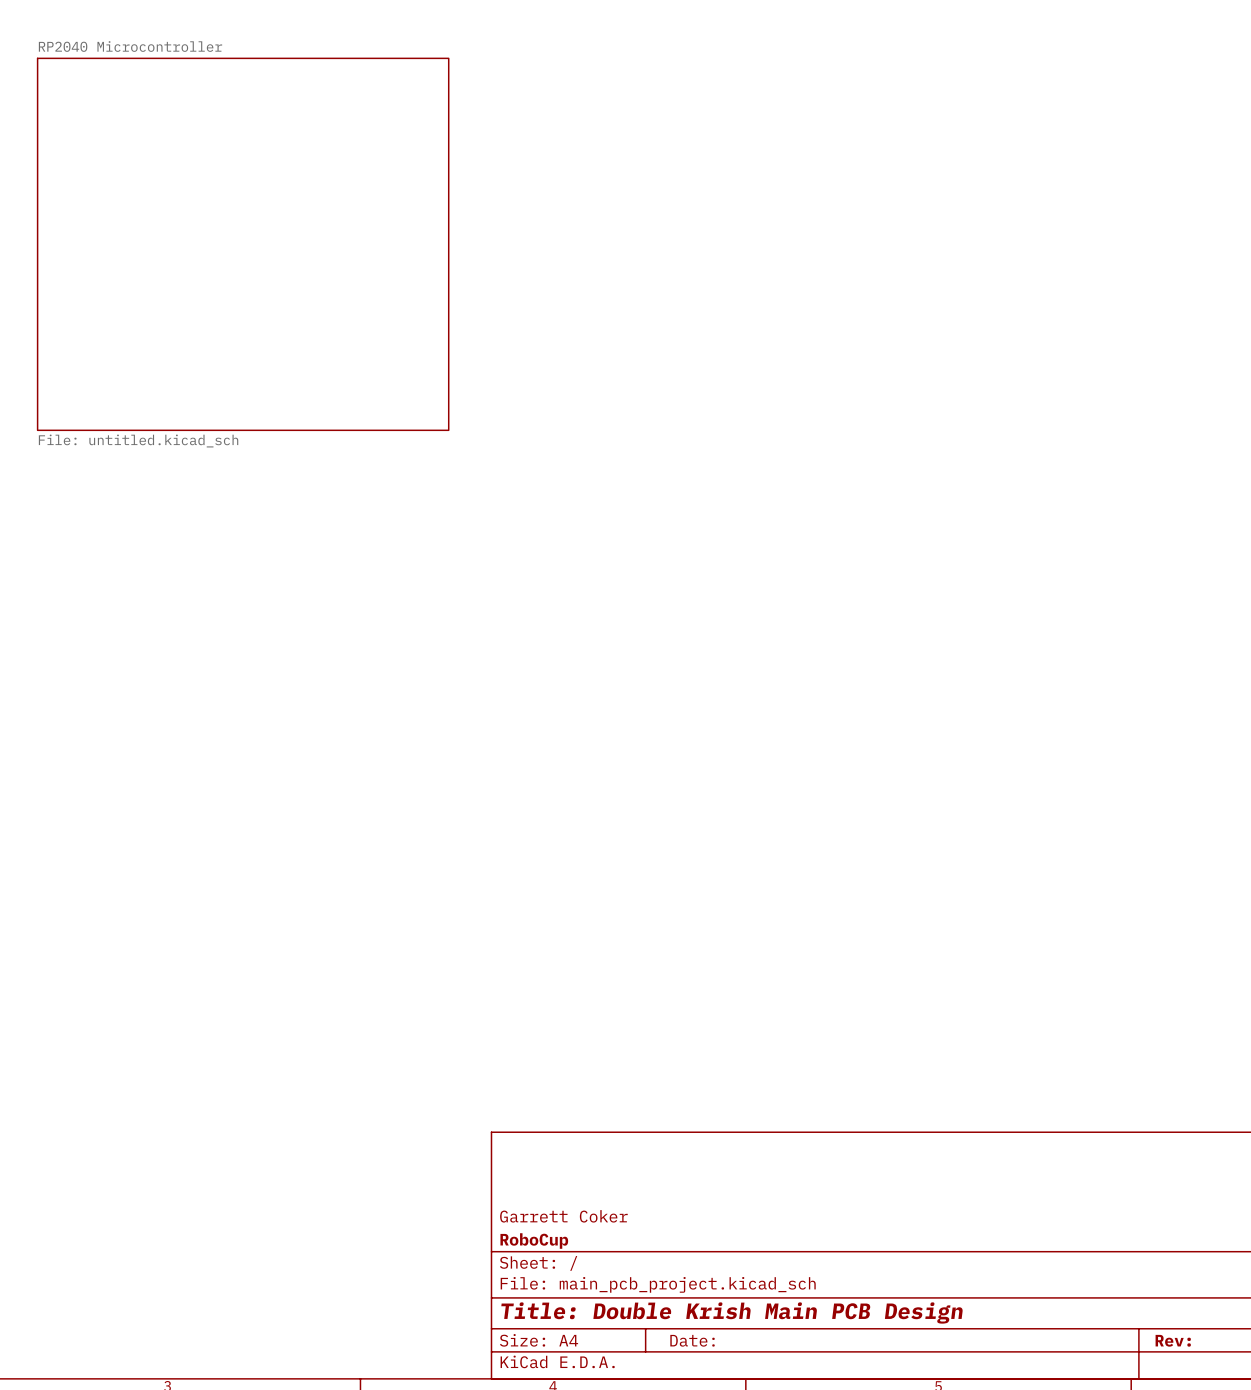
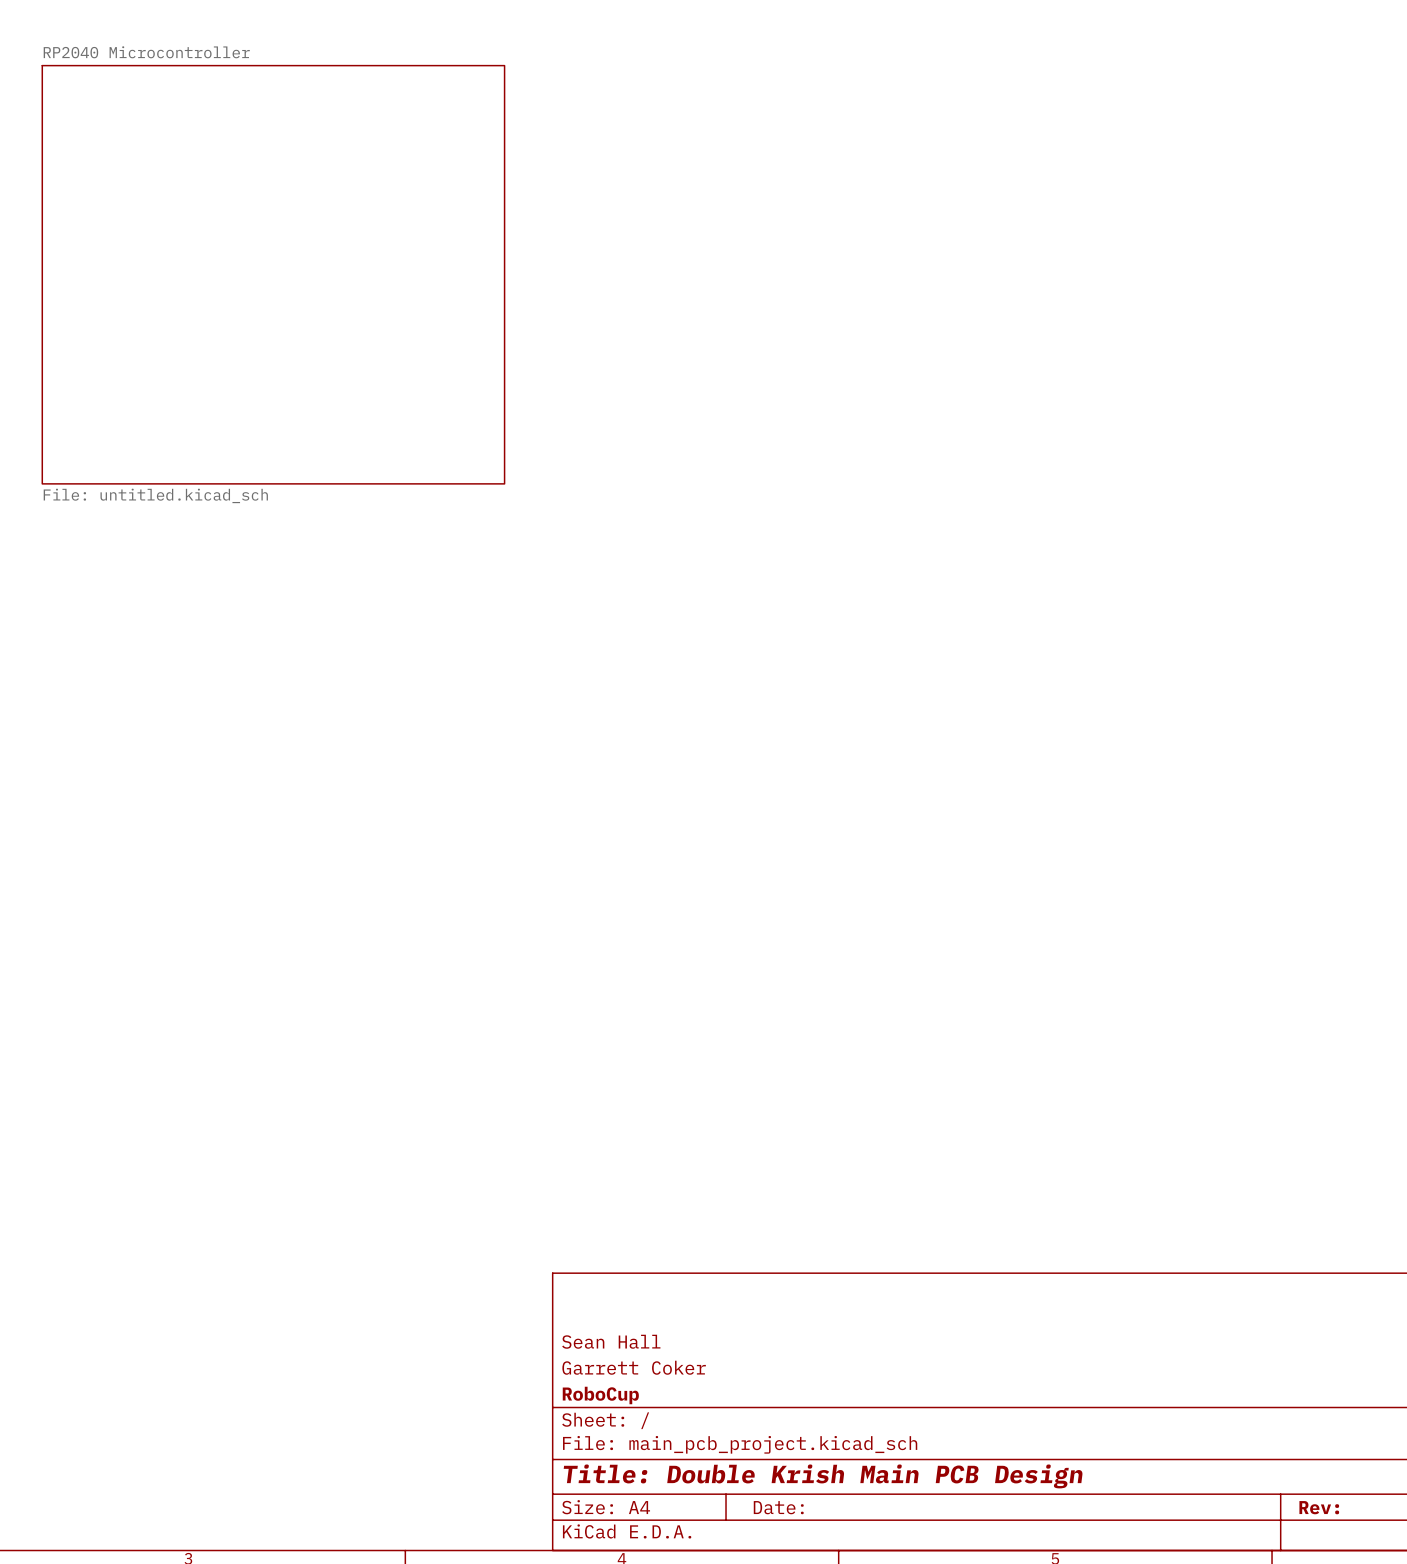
title block: none -> Sean Hall (611, 1341)

